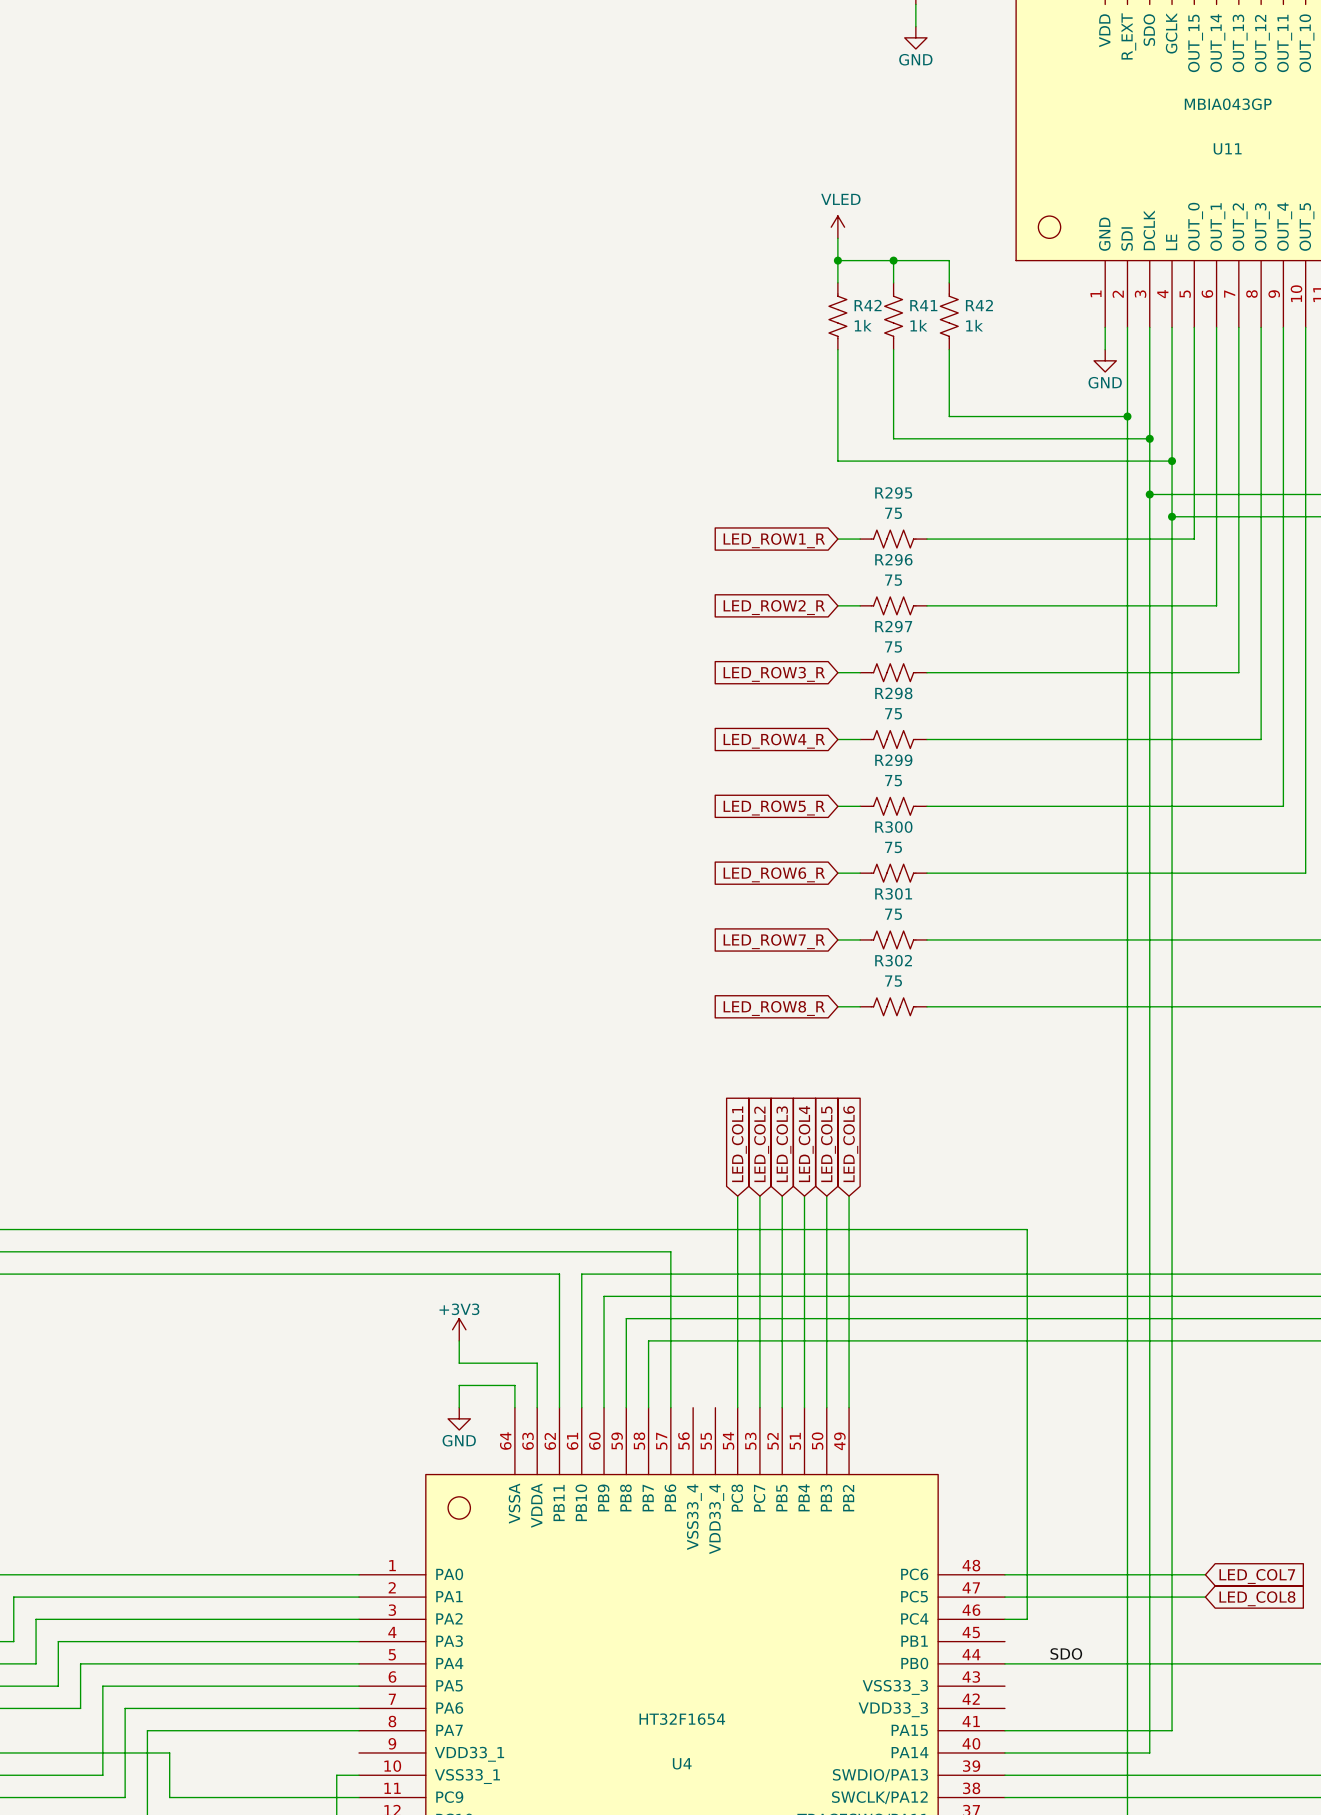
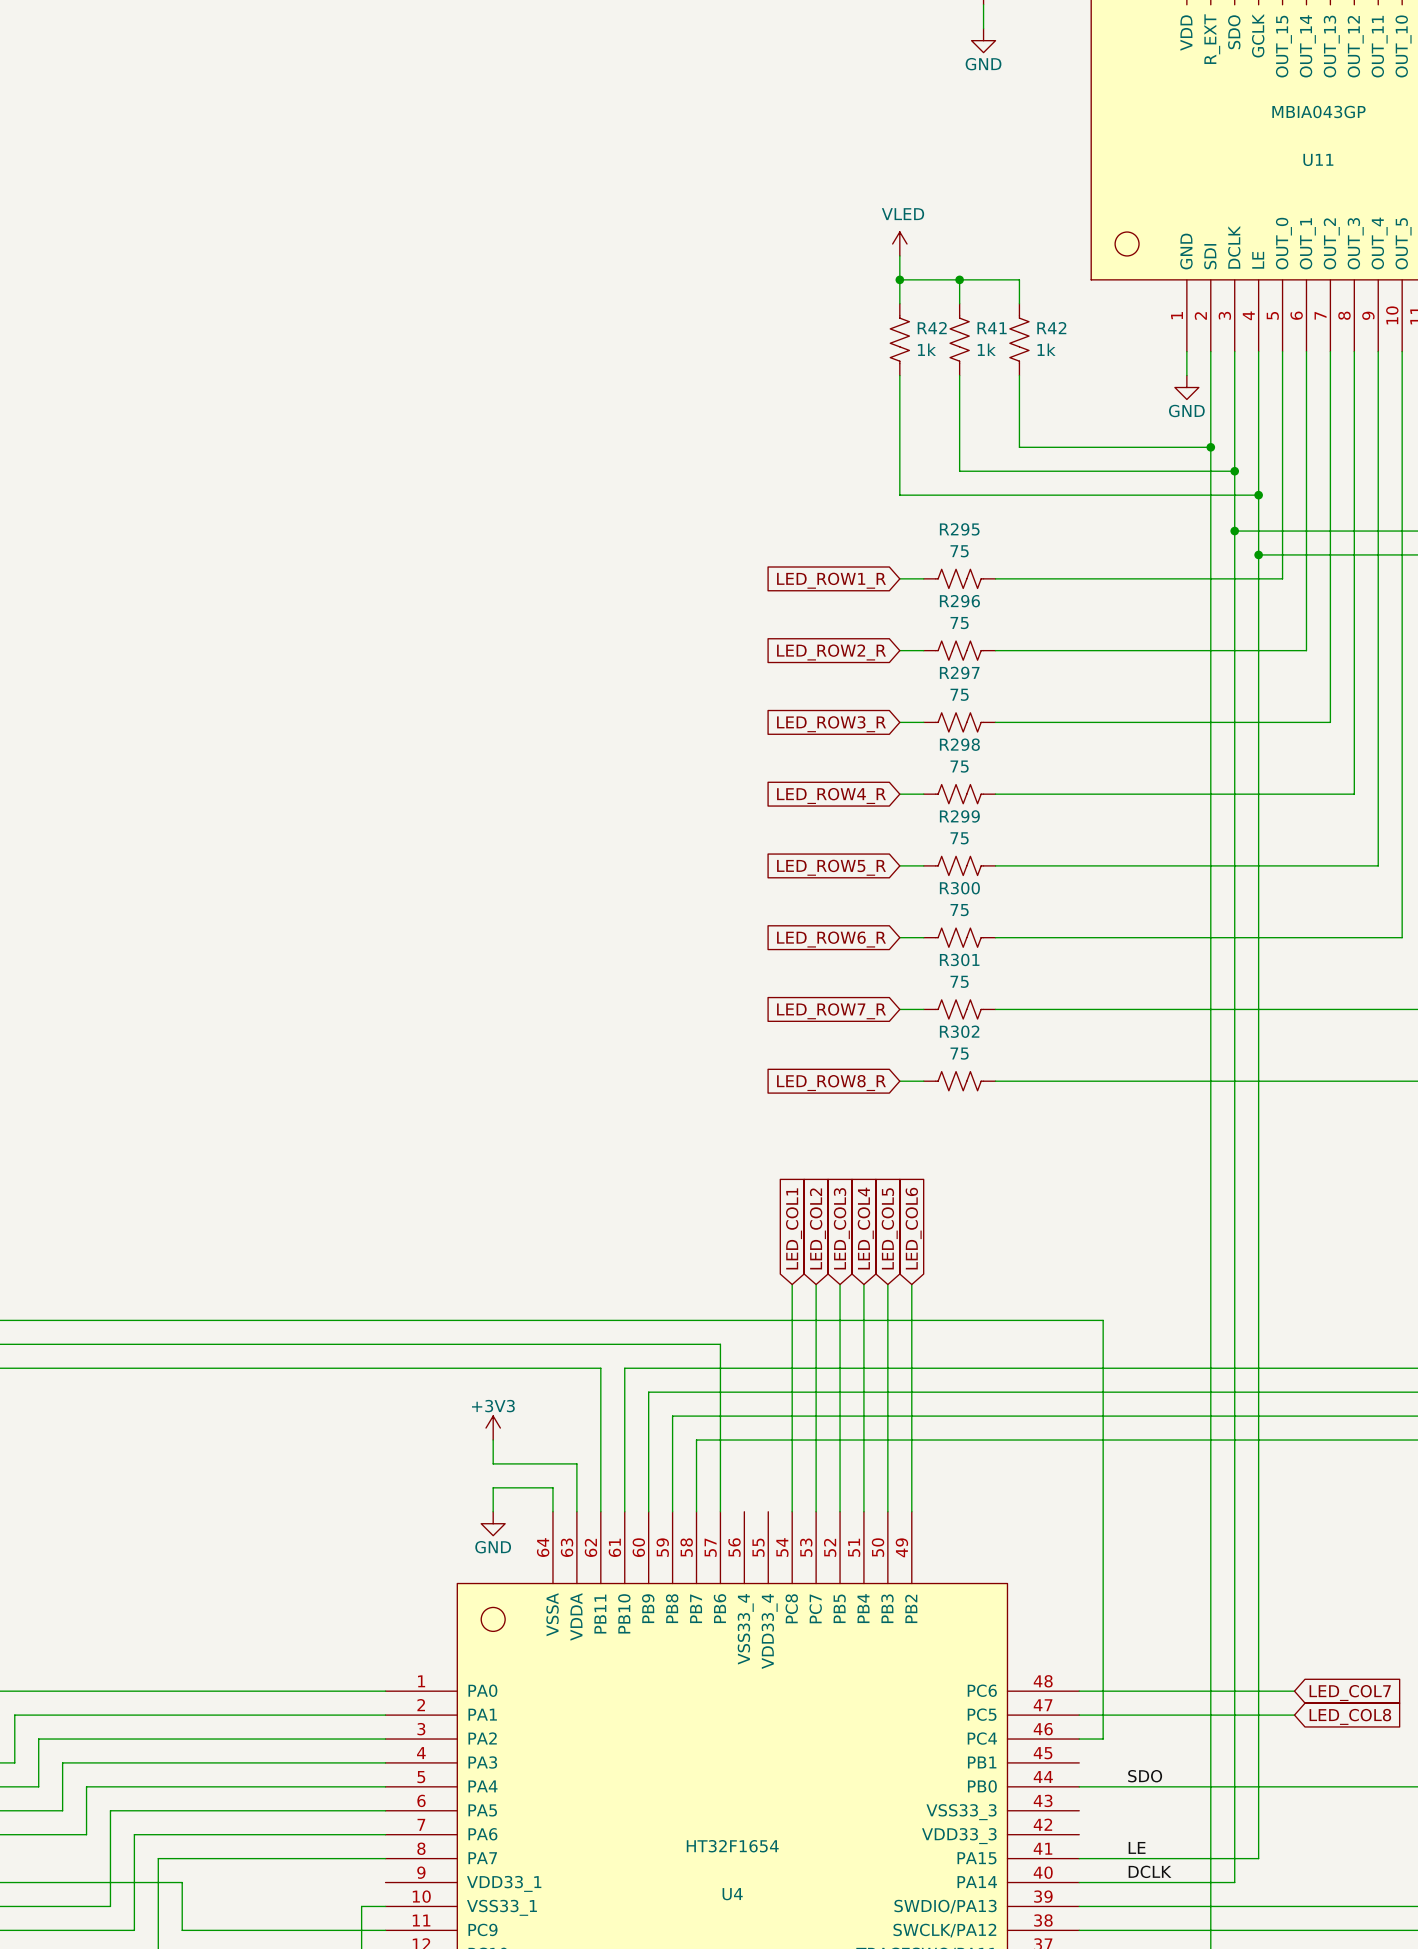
label: none -> LE (1137, 1847)
label: none -> DCLK (1150, 1871)

